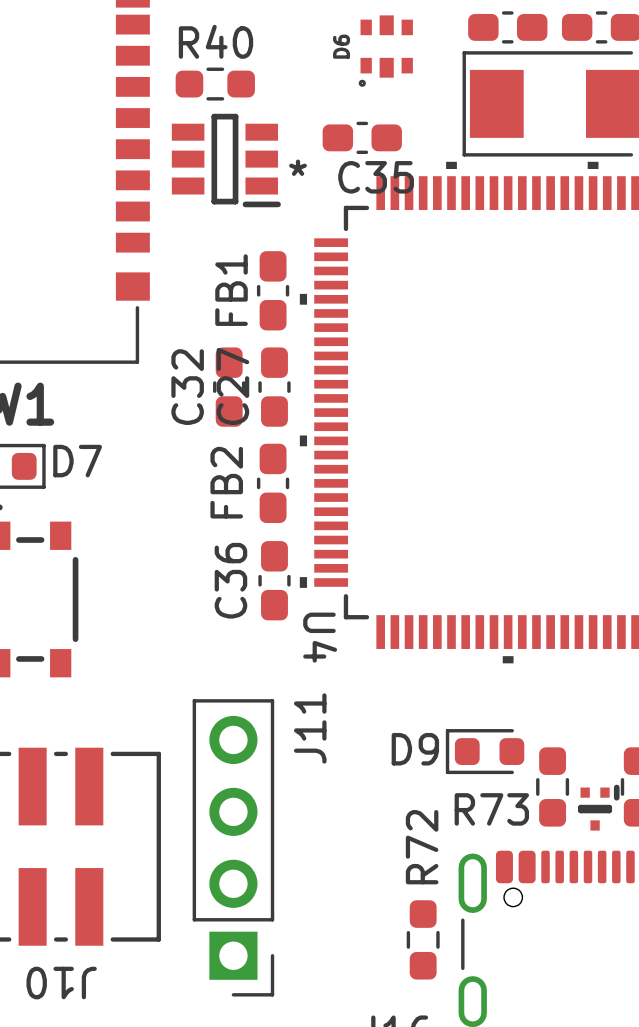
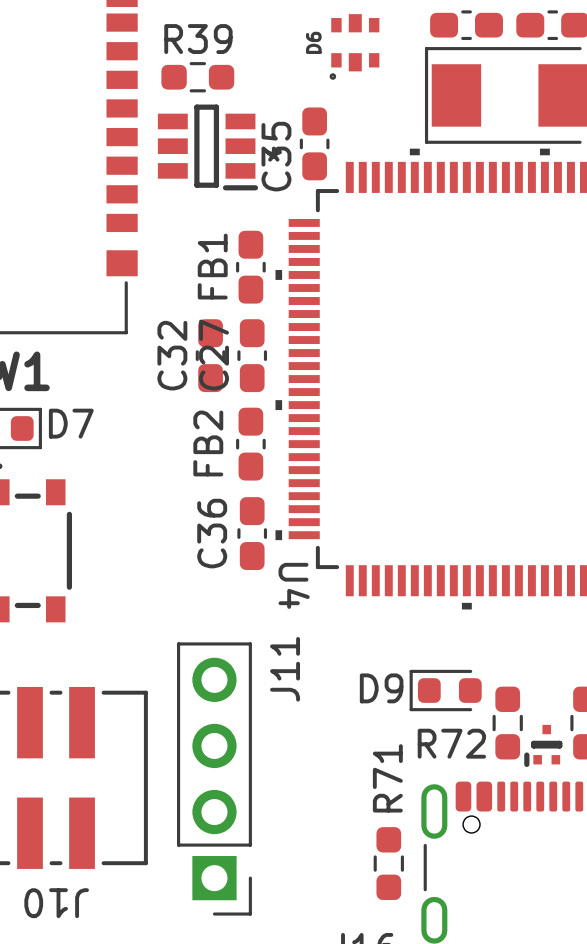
R40 name: R40 (215, 41) -> R39 (198, 39)
C35 rotation: 0° (362, 137) -> 90° clockwise (314, 143)
part rotation: 0° (598, 807) -> 180° (543, 745)
R73 name: R73 (491, 809) -> R72 (451, 743)
R72 name: R72 (422, 847) -> R71 (387, 778)

